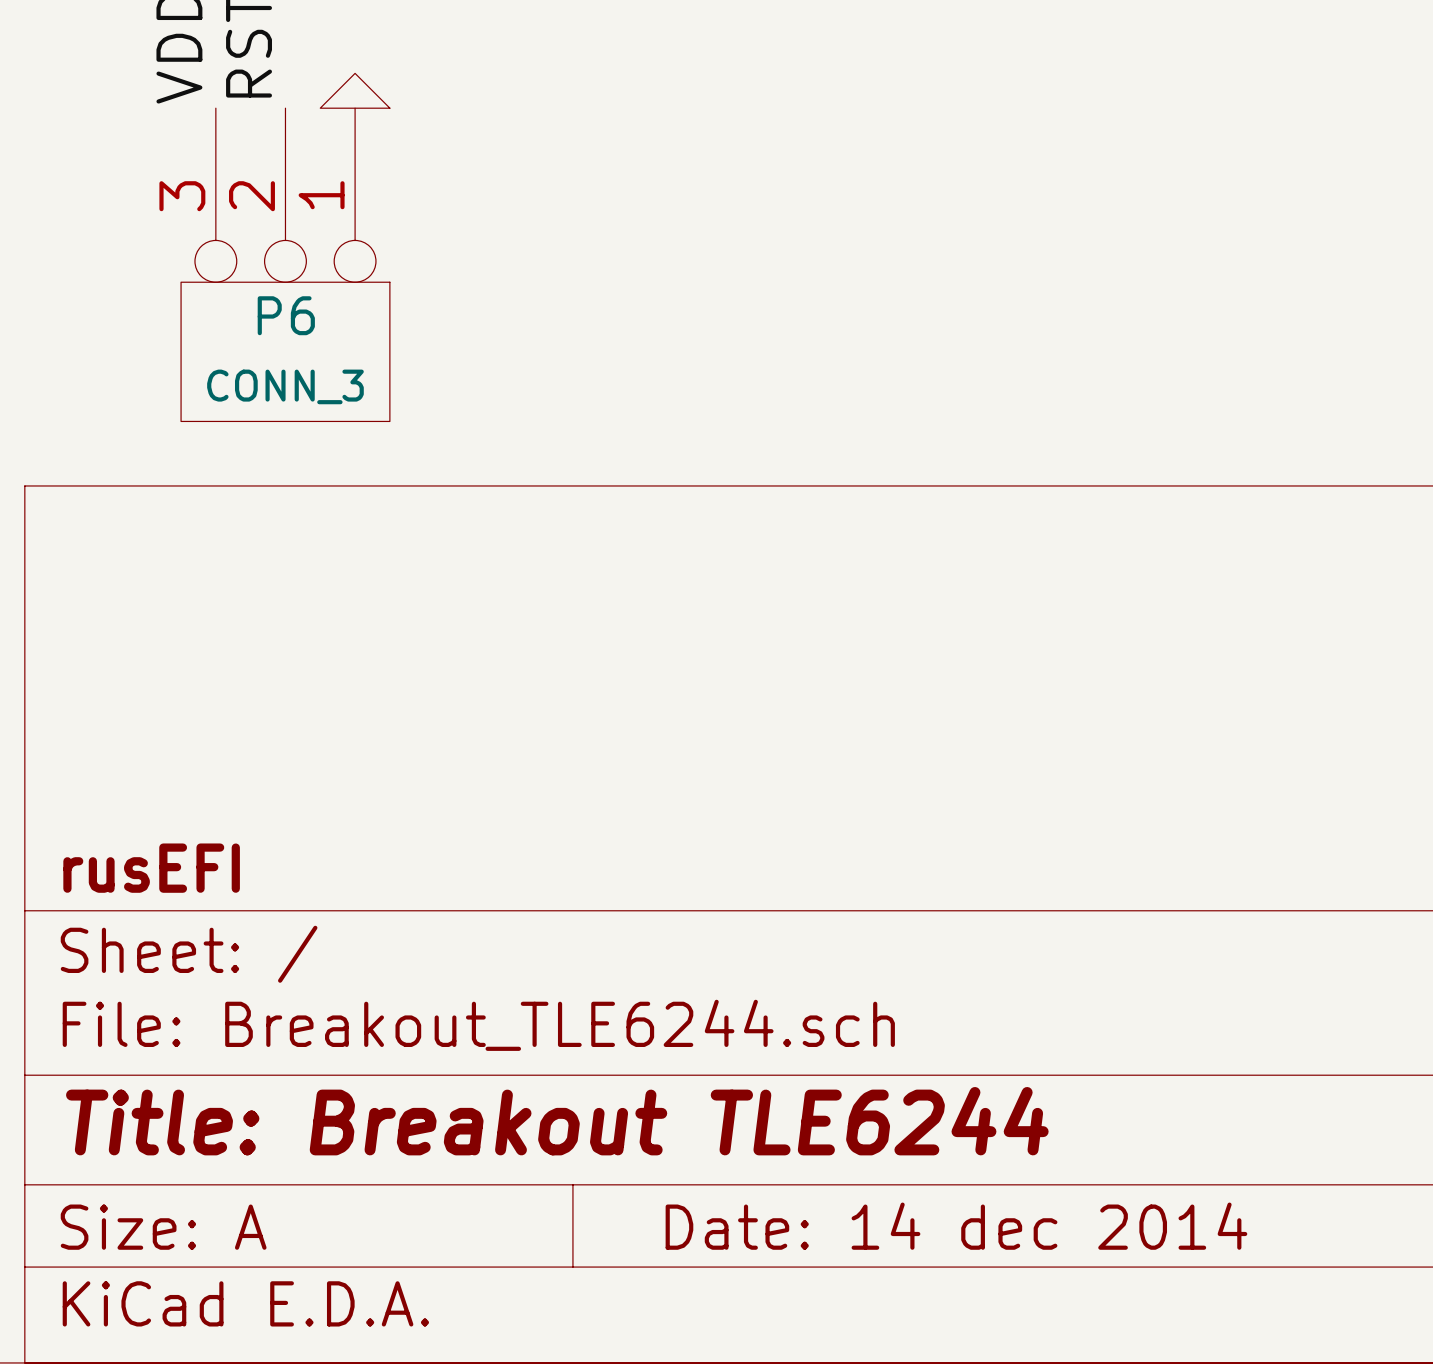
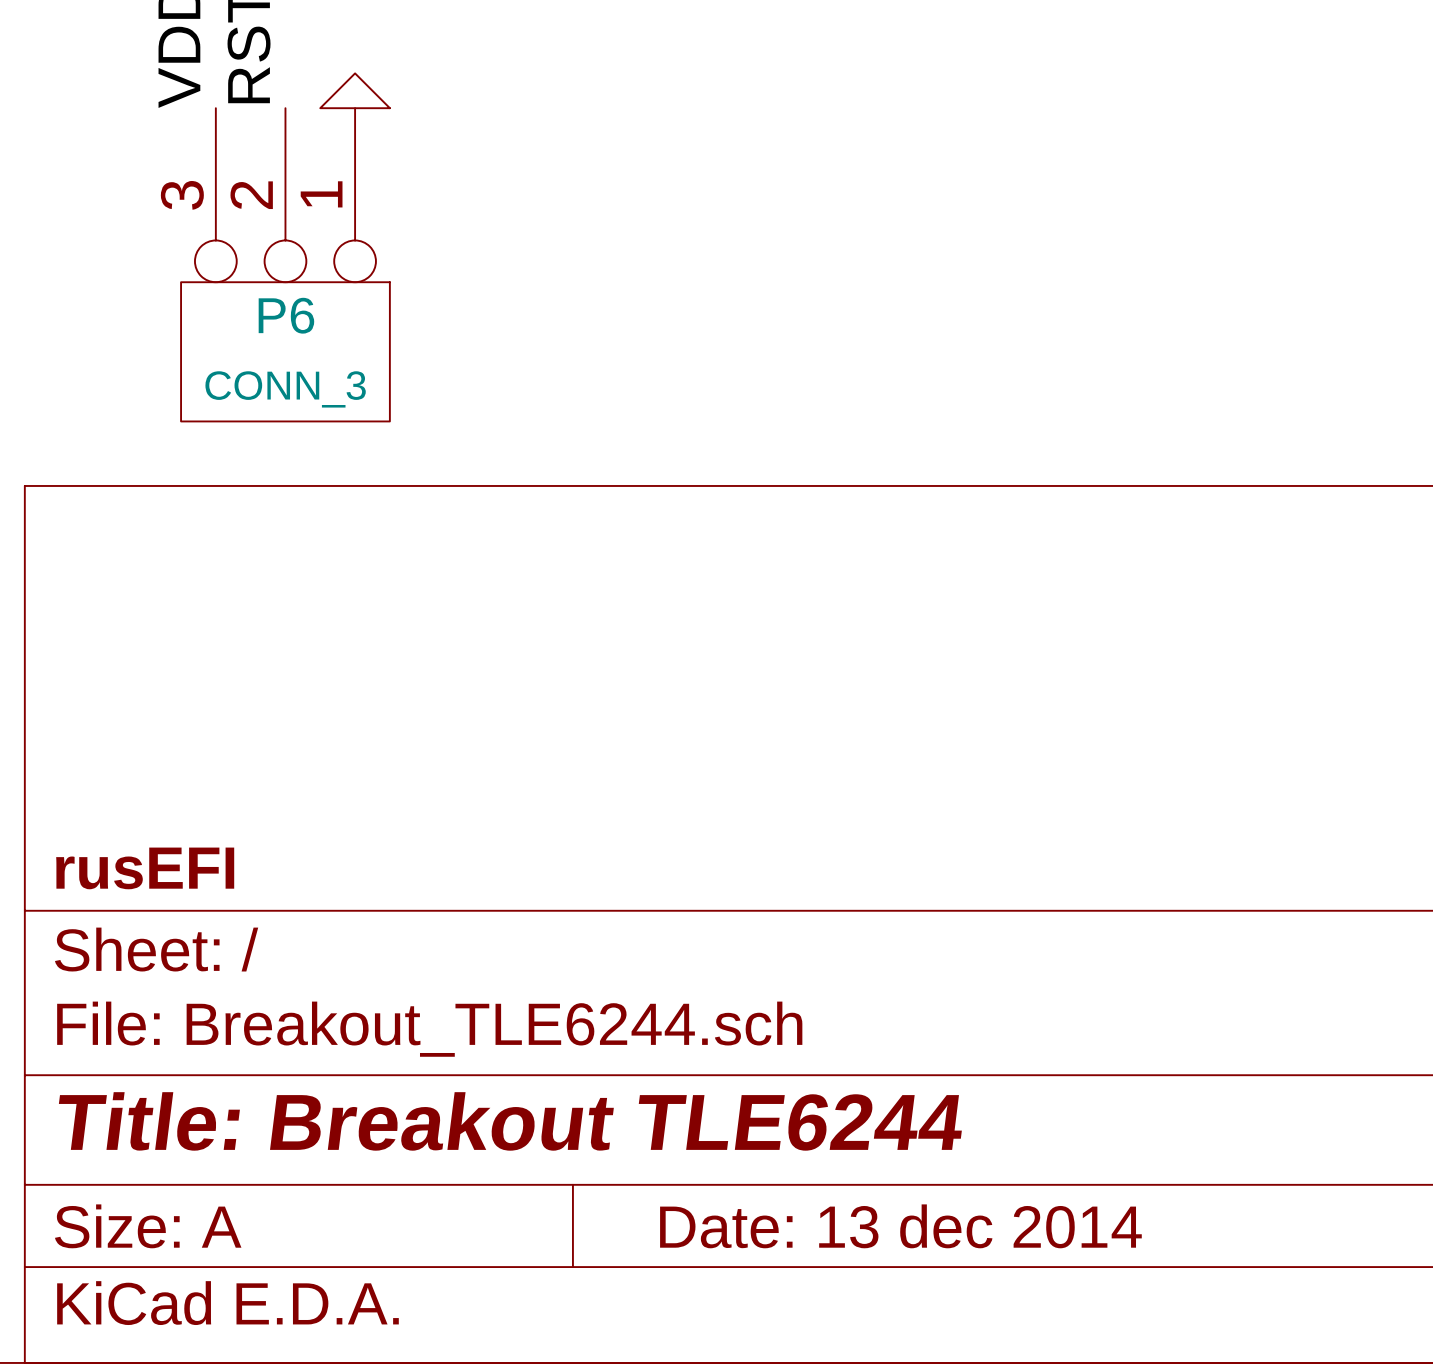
title block: Date: 14 dec 2014 (956, 1226) -> Date: 13 dec 2014 (900, 1226)

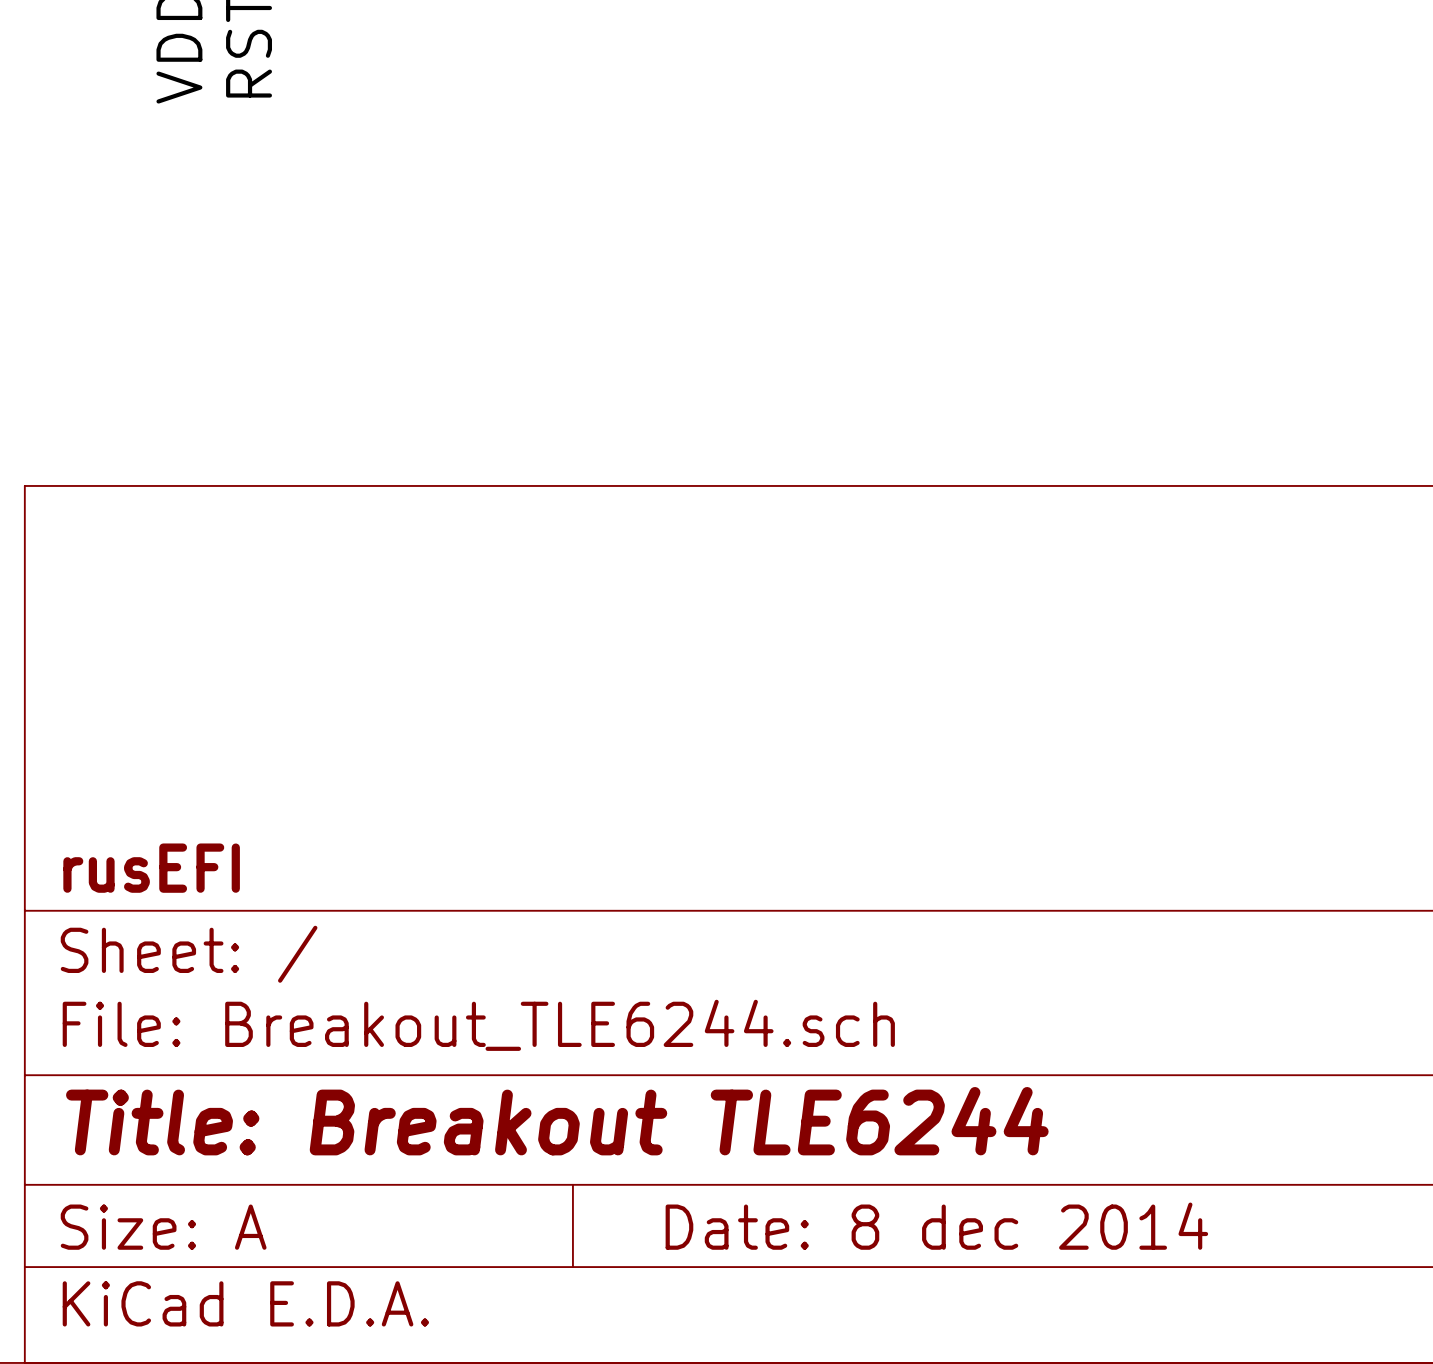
power symbol: (355, 90) -> none
P6: CONN_3 (285, 264) -> none
title block: Date: 13 dec 2014 (900, 1226) -> Date: 8 dec 2014 (936, 1226)

